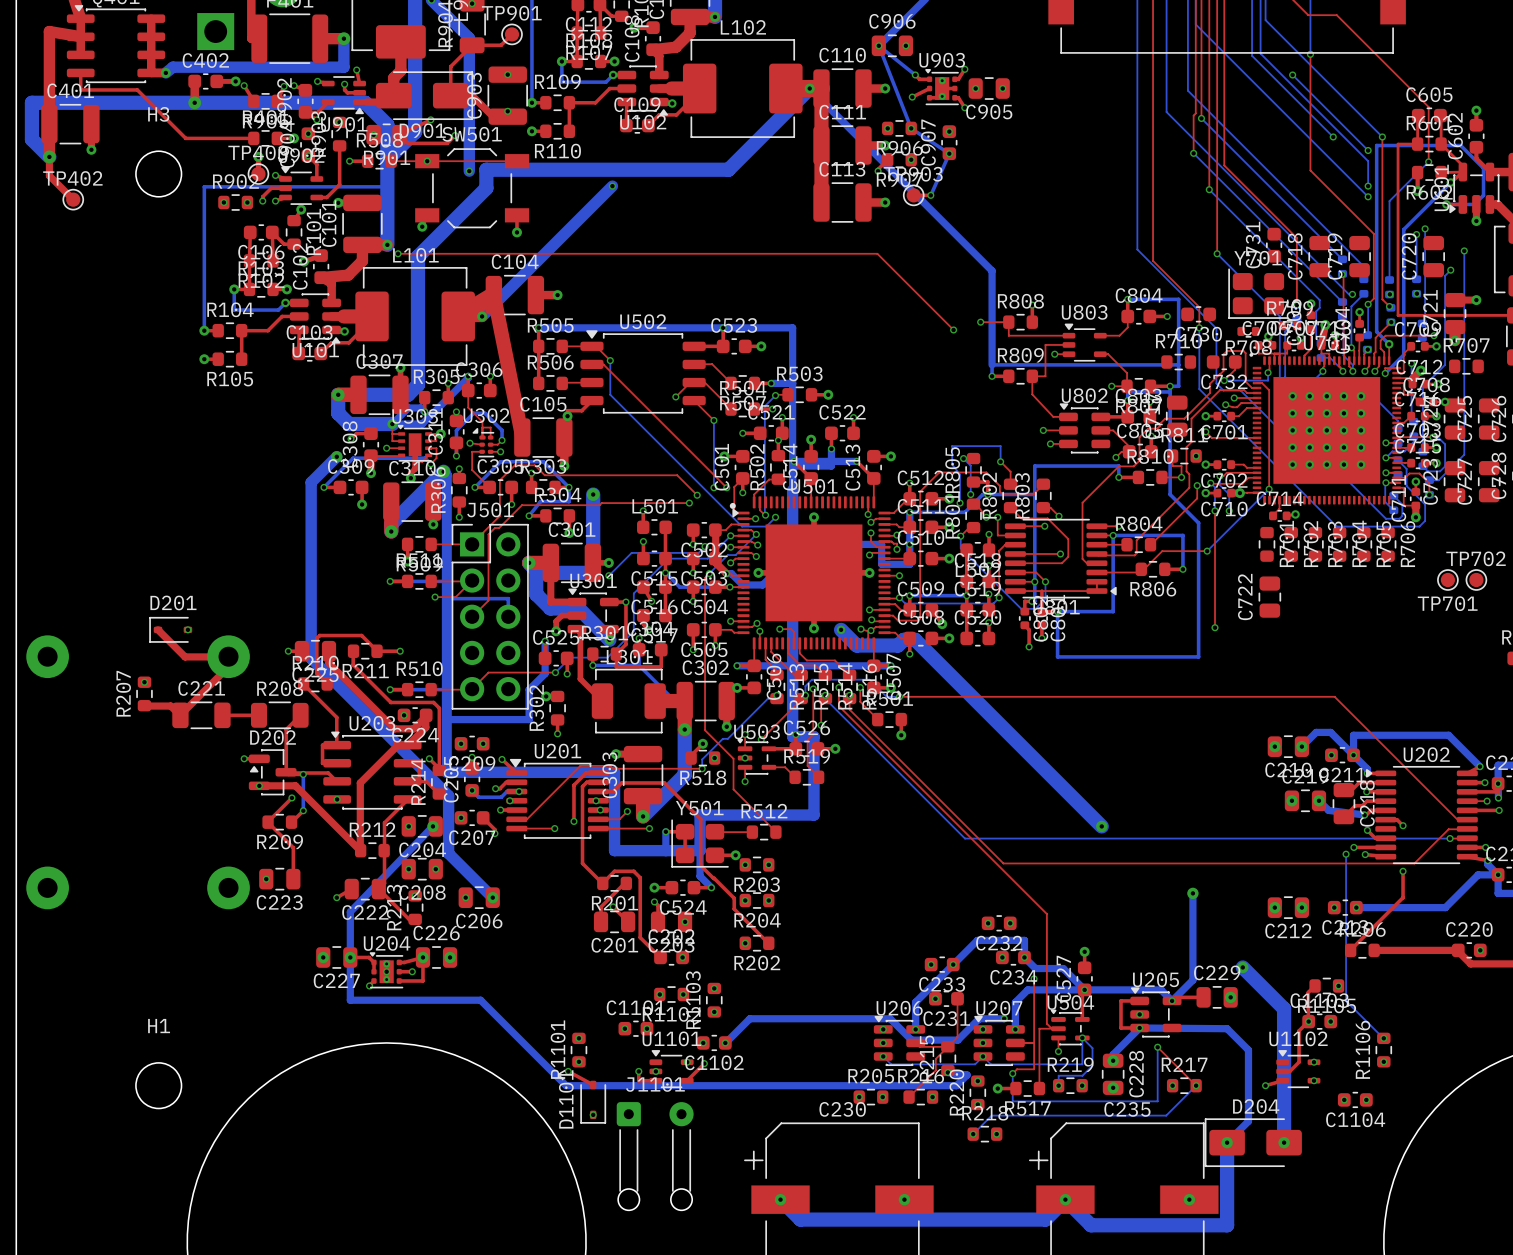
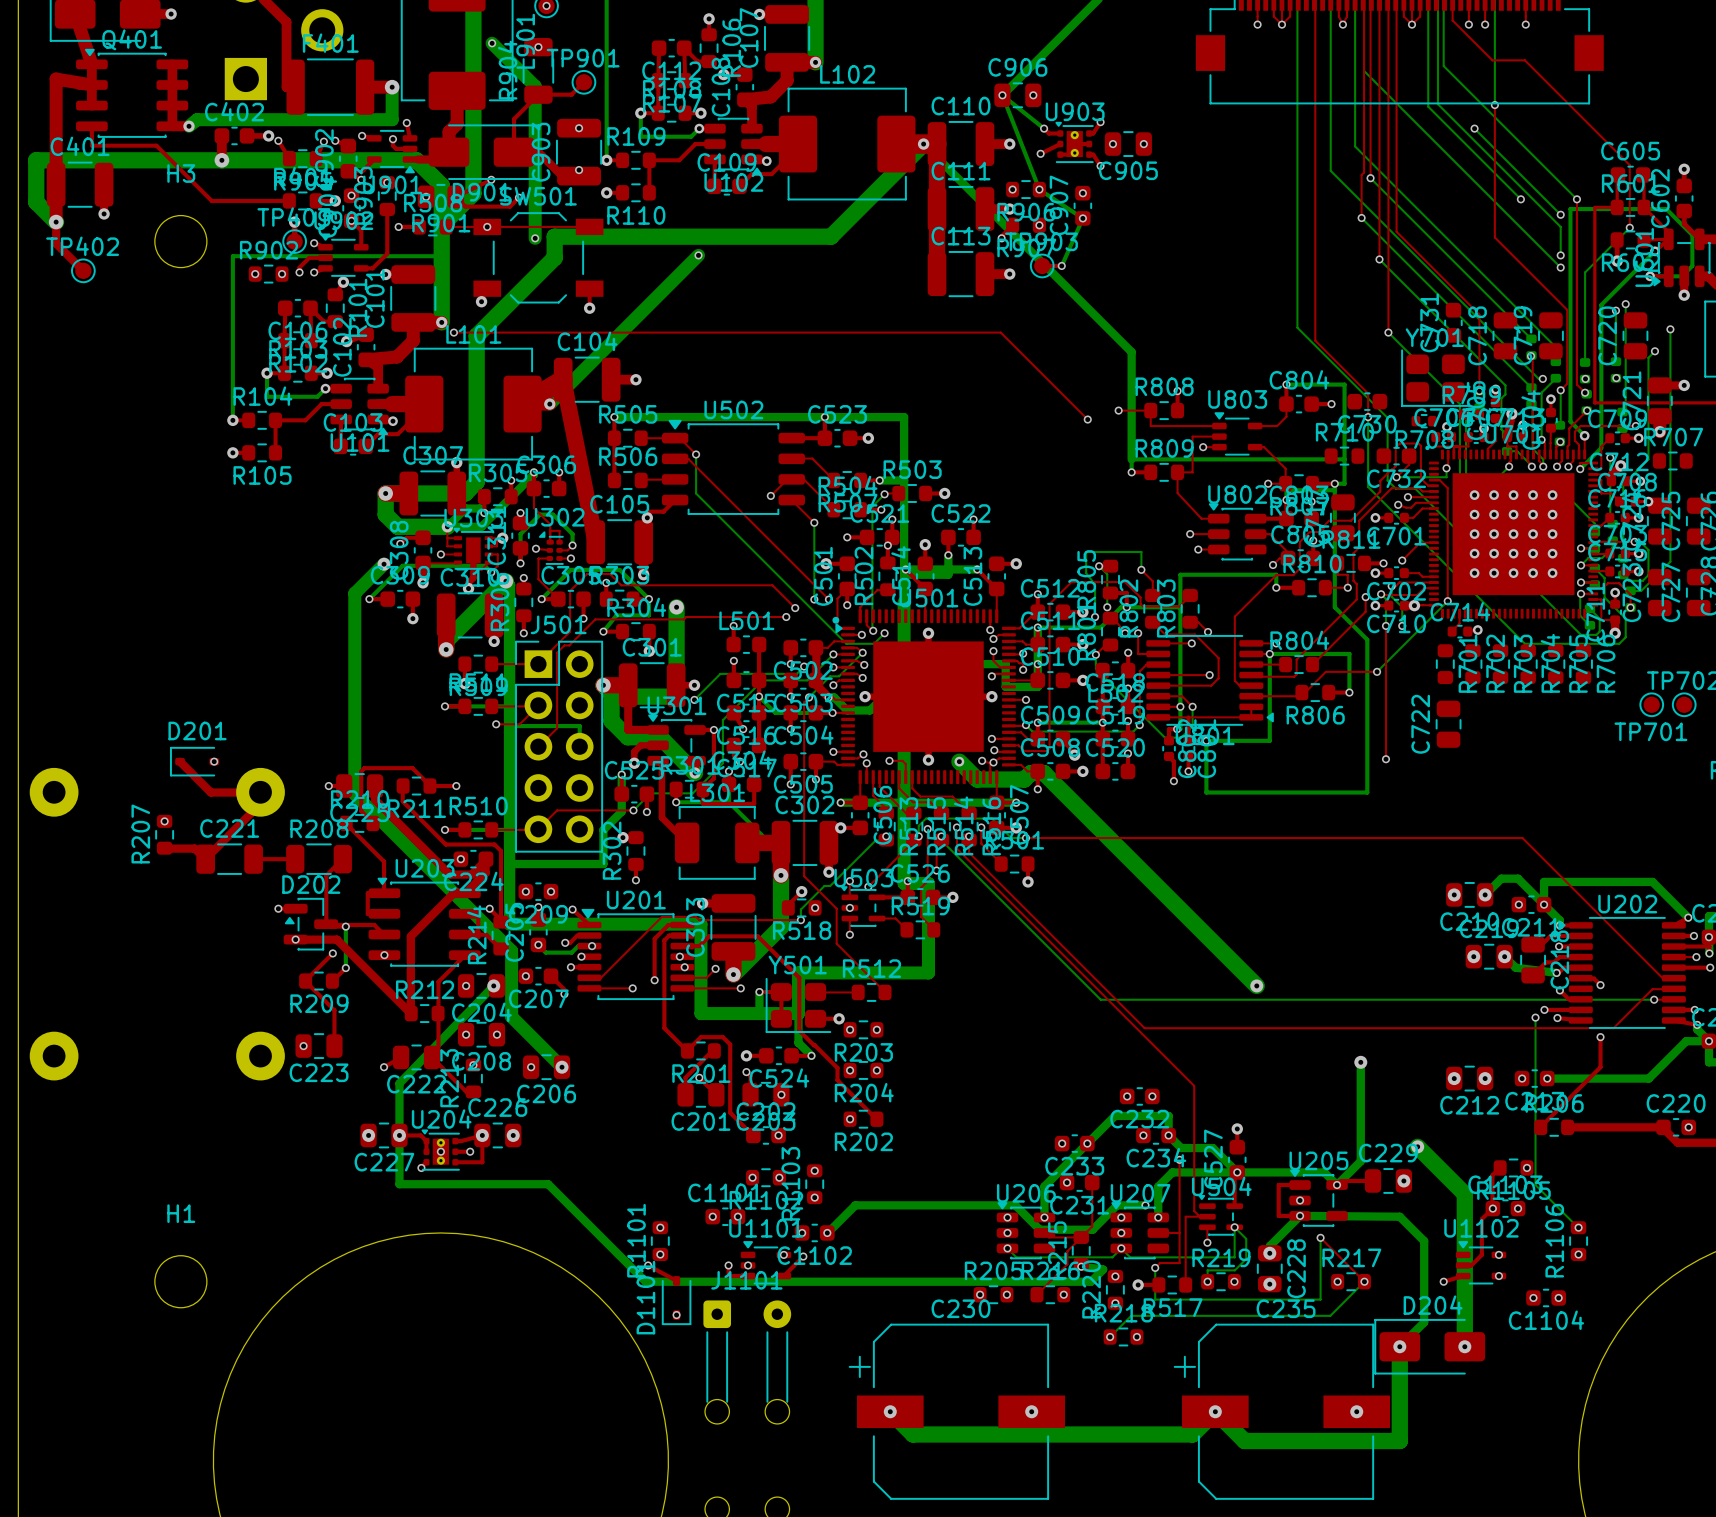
top track: (1205, 431) (1211, 437) (1244, 437) -> (1402, 560) (1420, 542)
via: (1205, 431) -> none
via: none -> (1402, 560)
top track: none -> (1364, 563) (1383, 563)
via: (1196, 456) -> none
via: none -> (1383, 563)

